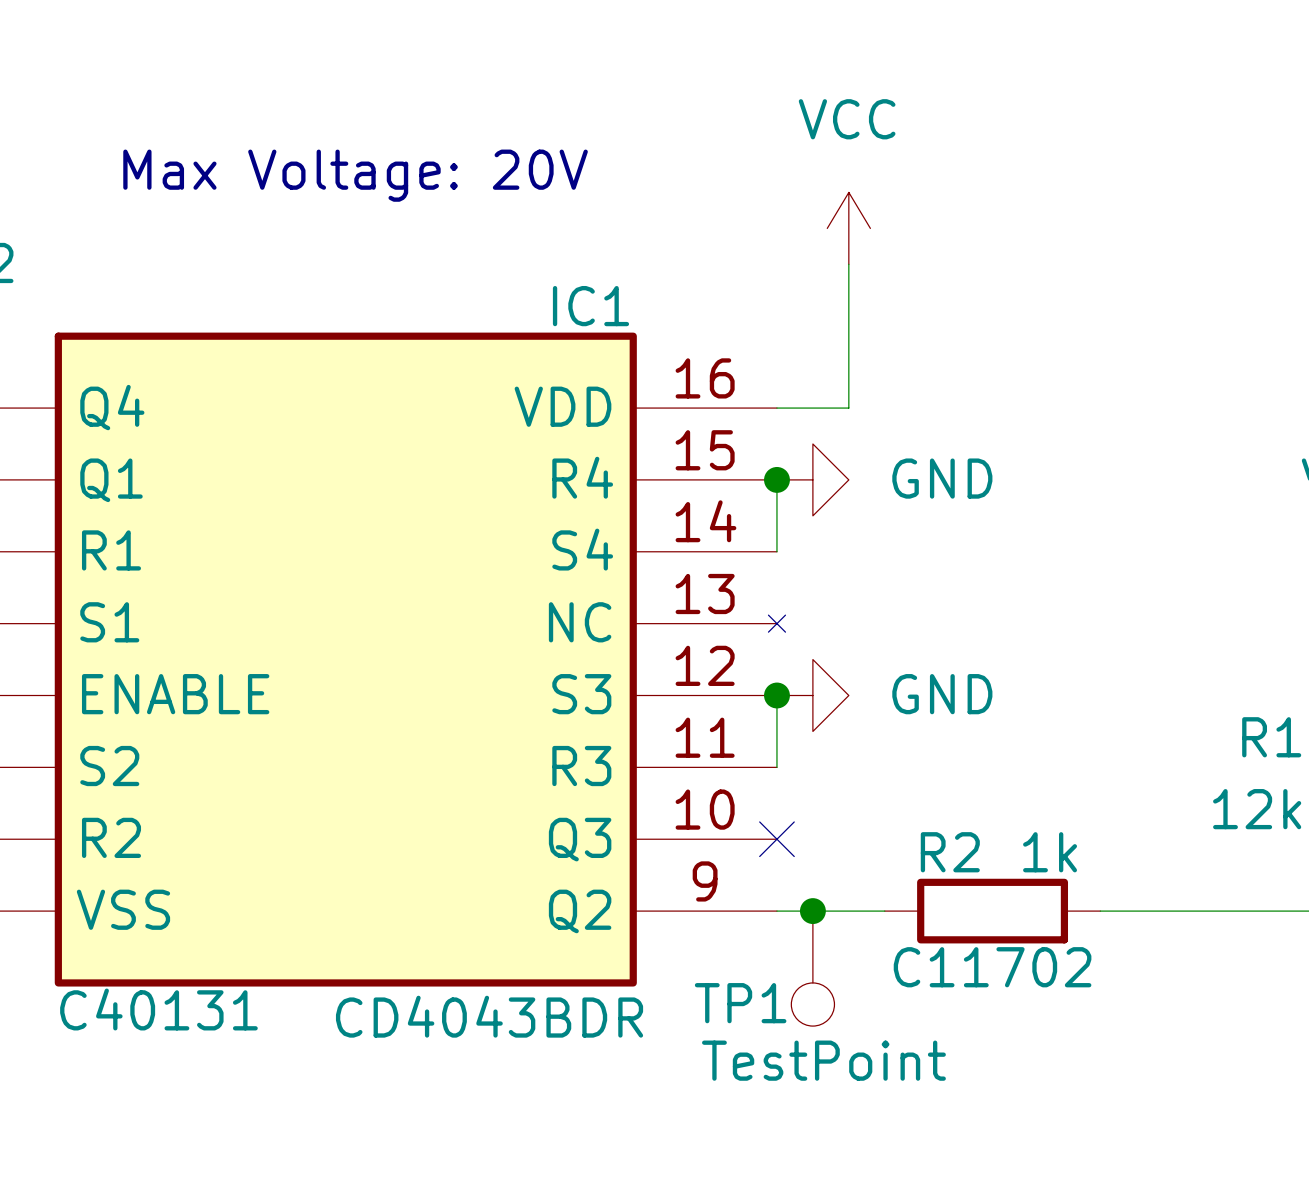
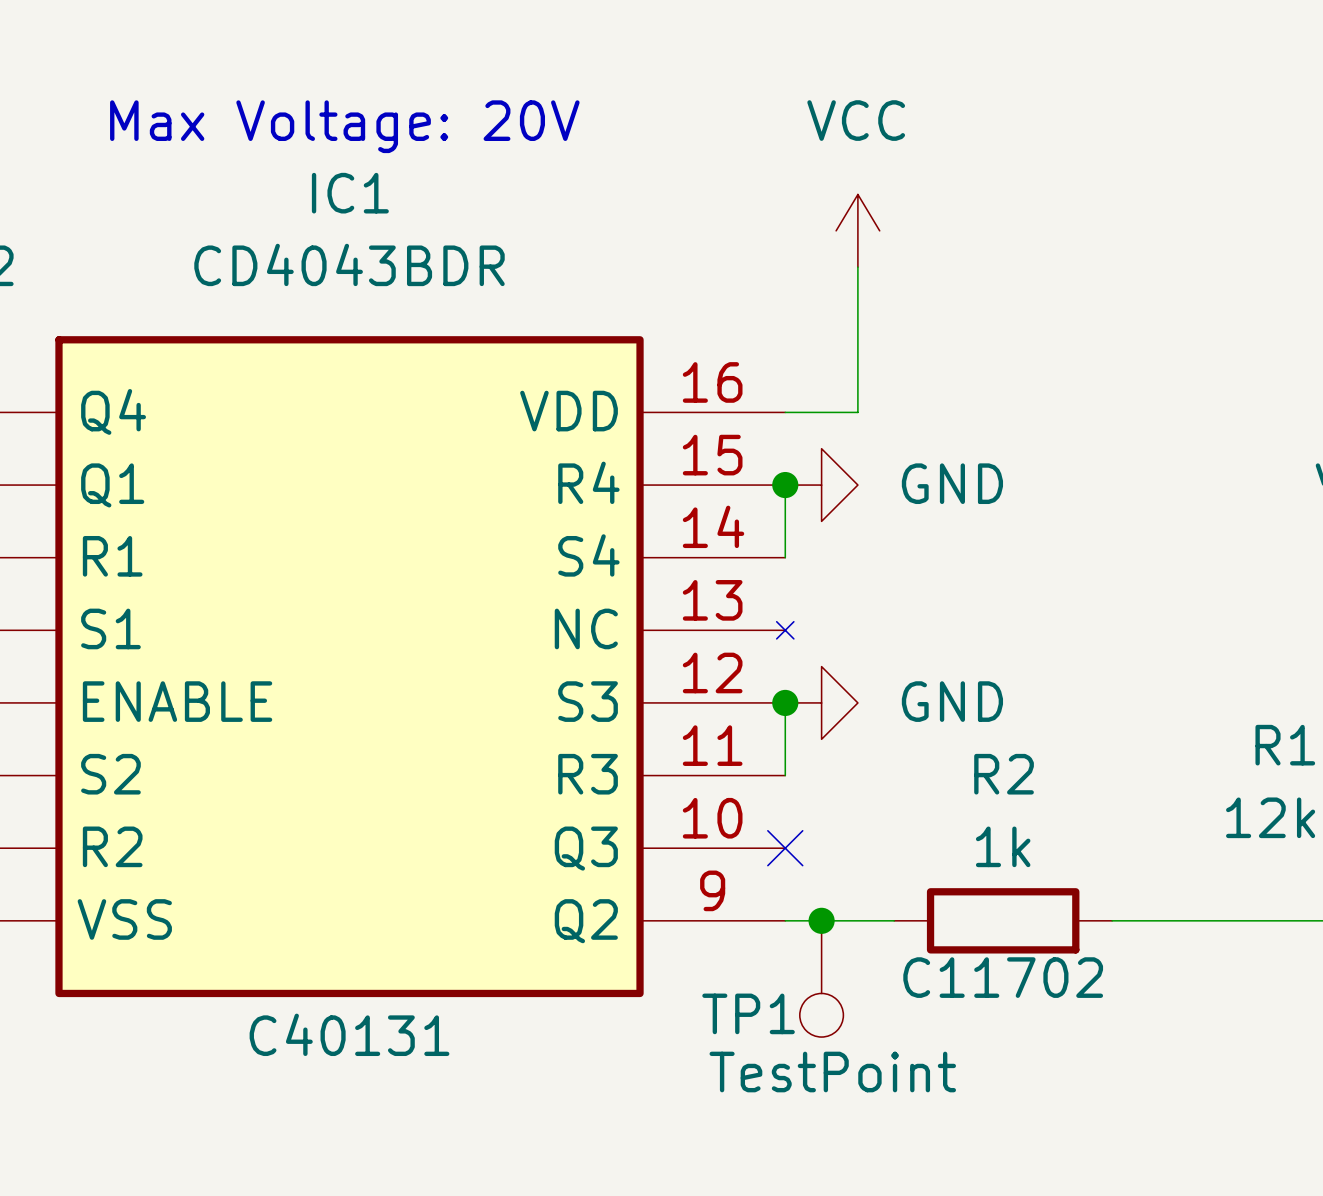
text position: Max Voltage: 20V (355, 175) -> Max Voltage: 20V (344, 126)
IC1 name position: IC1 (590, 306) -> IC1 (350, 193)
R2 name position: R2 (950, 852) -> R2 (1004, 774)
R2 value position: 1k (1050, 852) -> 1k (1003, 846)
IC1 text position: C40131 (158, 1009) -> C40131 (349, 1034)
IC1 value position: CD4043BDR (489, 1016) -> CD4043BDR (349, 264)

